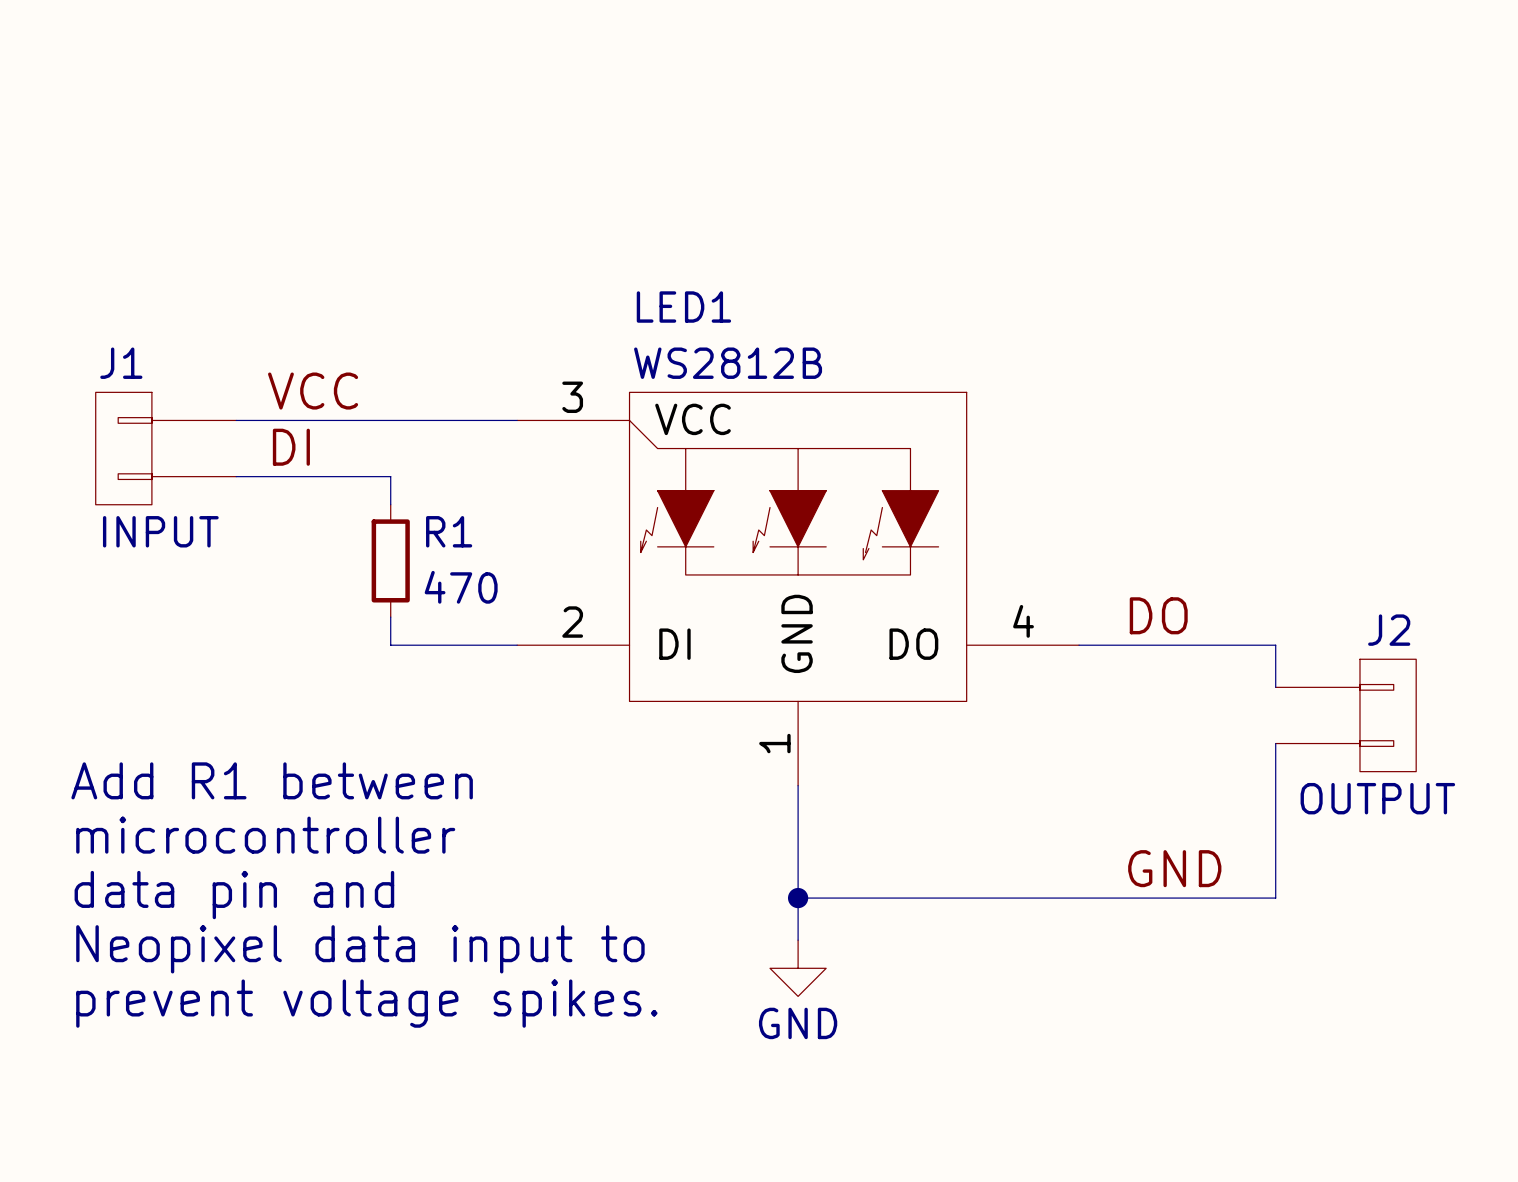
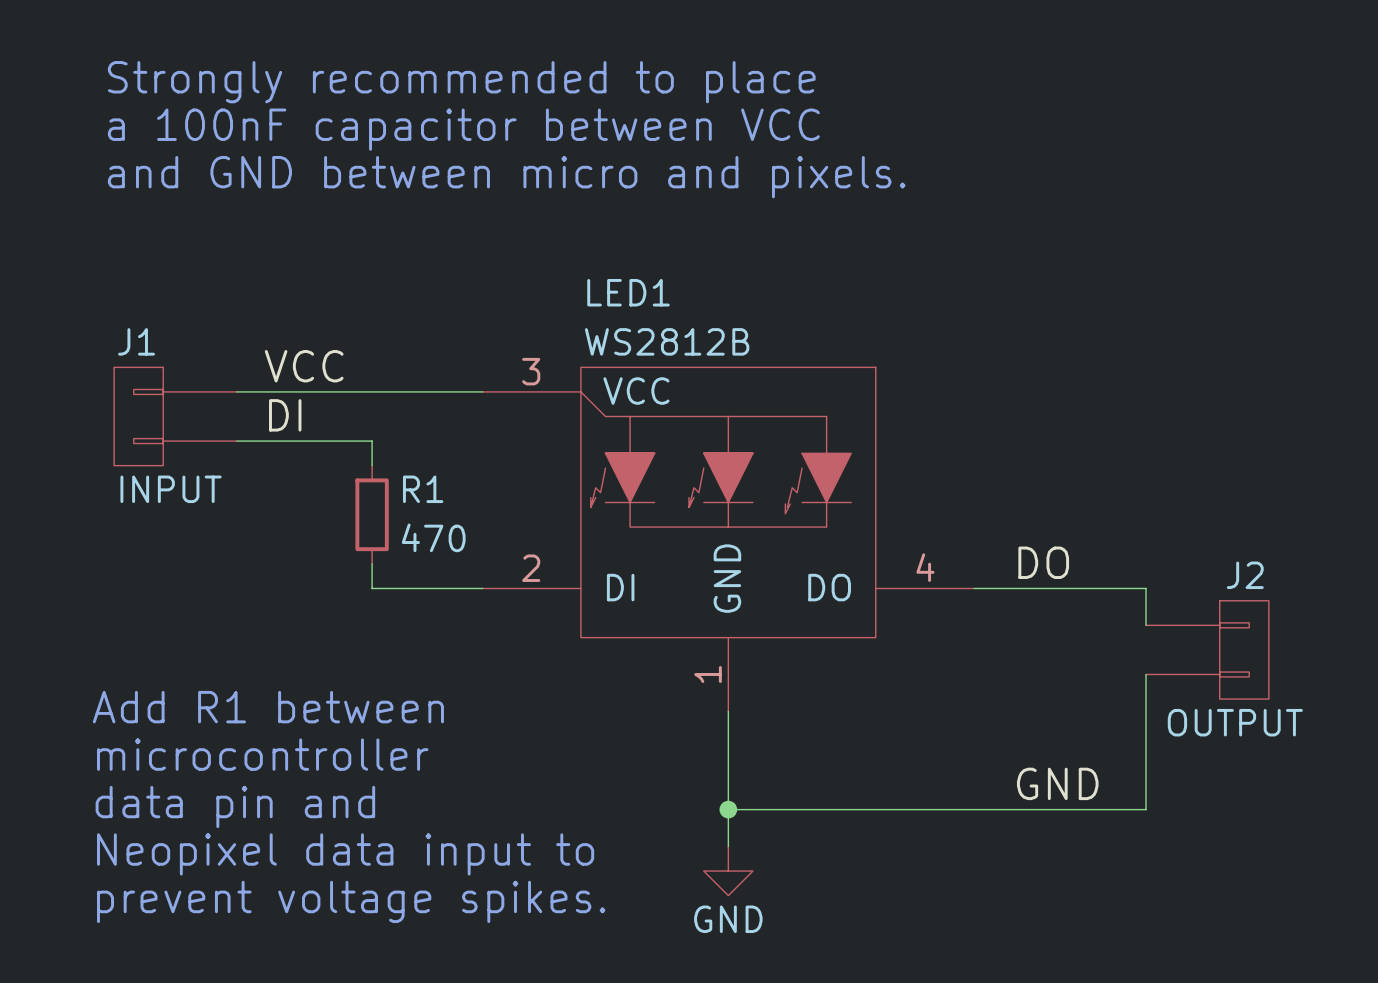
text: none -> Strongly recommended to place (461, 82)
text: none -> a 100nF capacitor between VCC (463, 129)
text: none -> and GND between micro and pixels. (506, 177)

